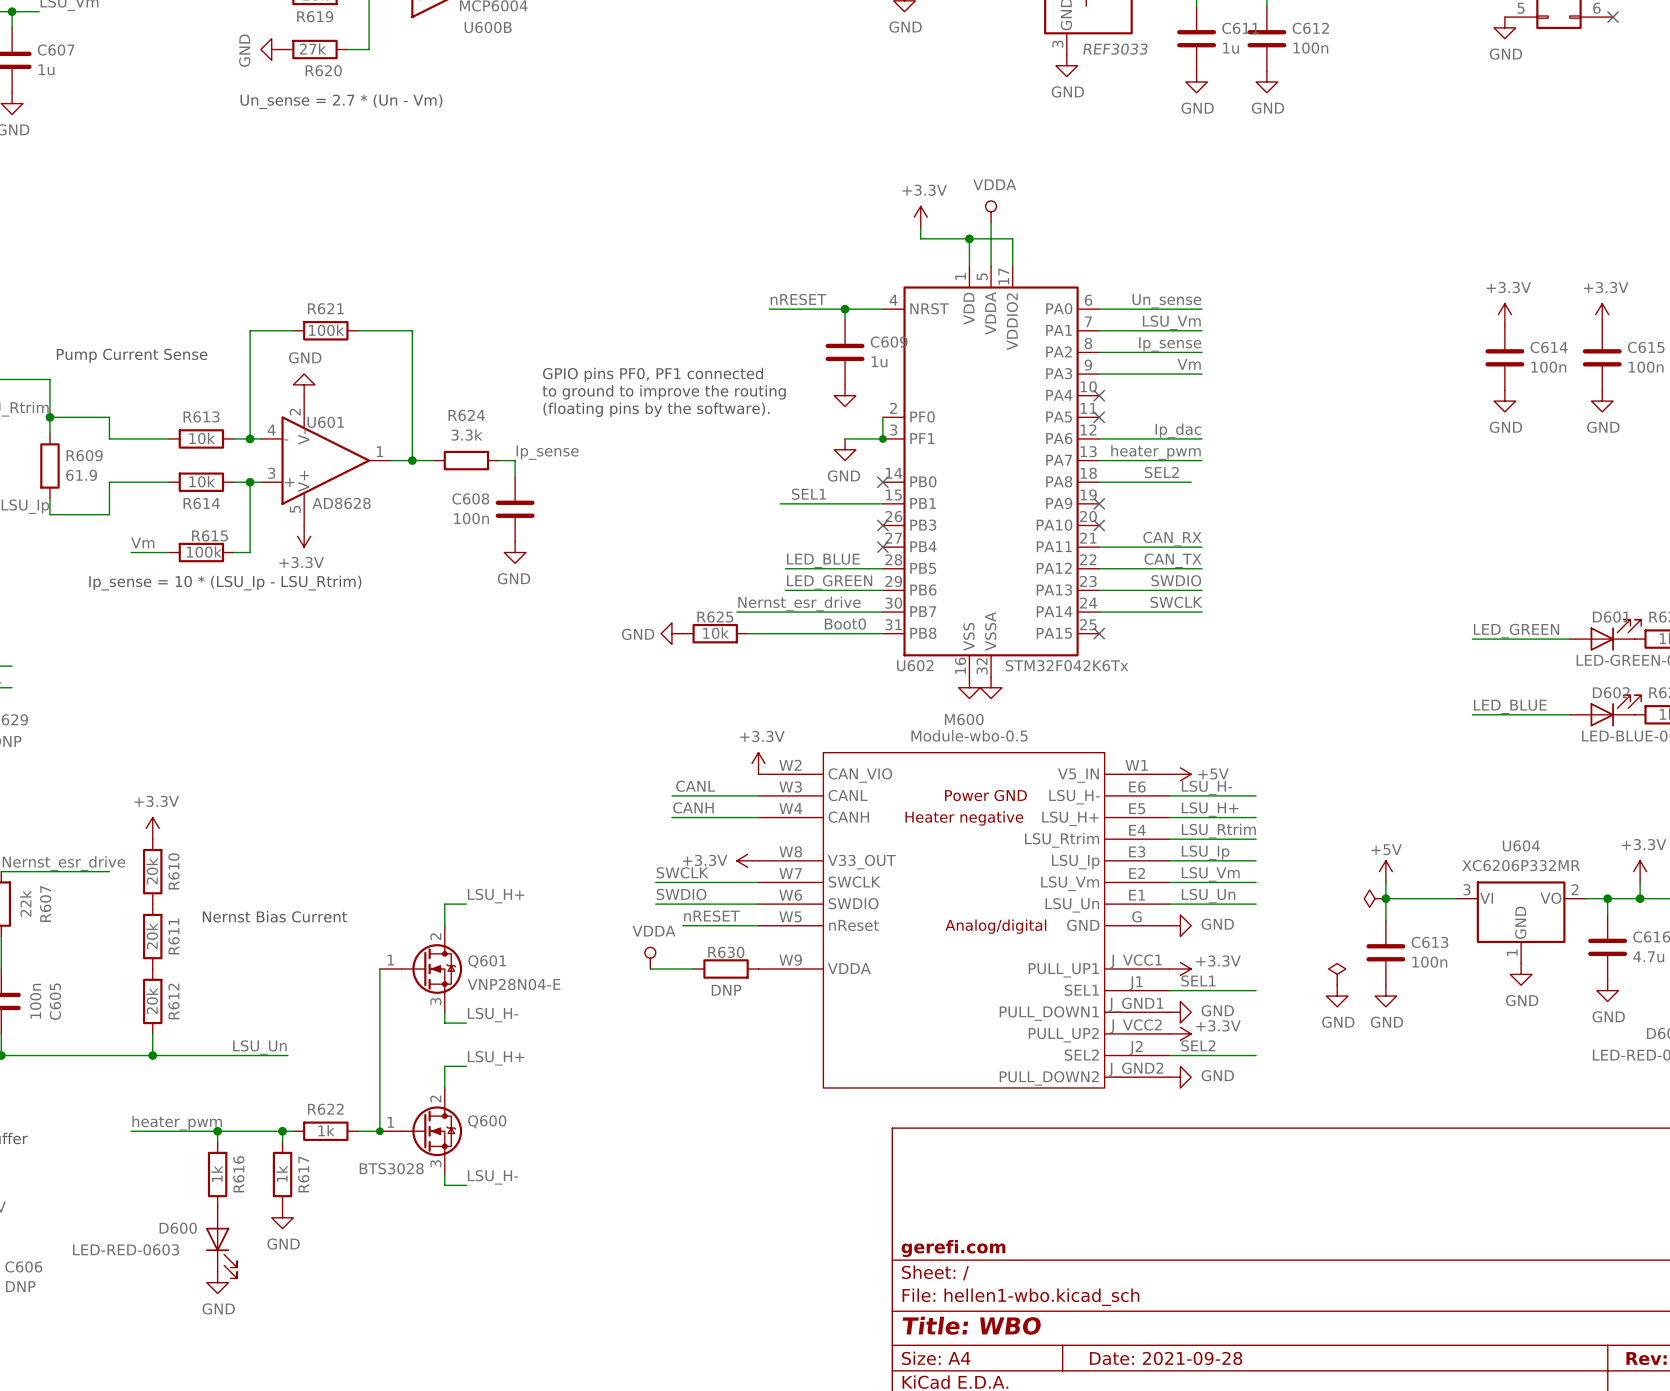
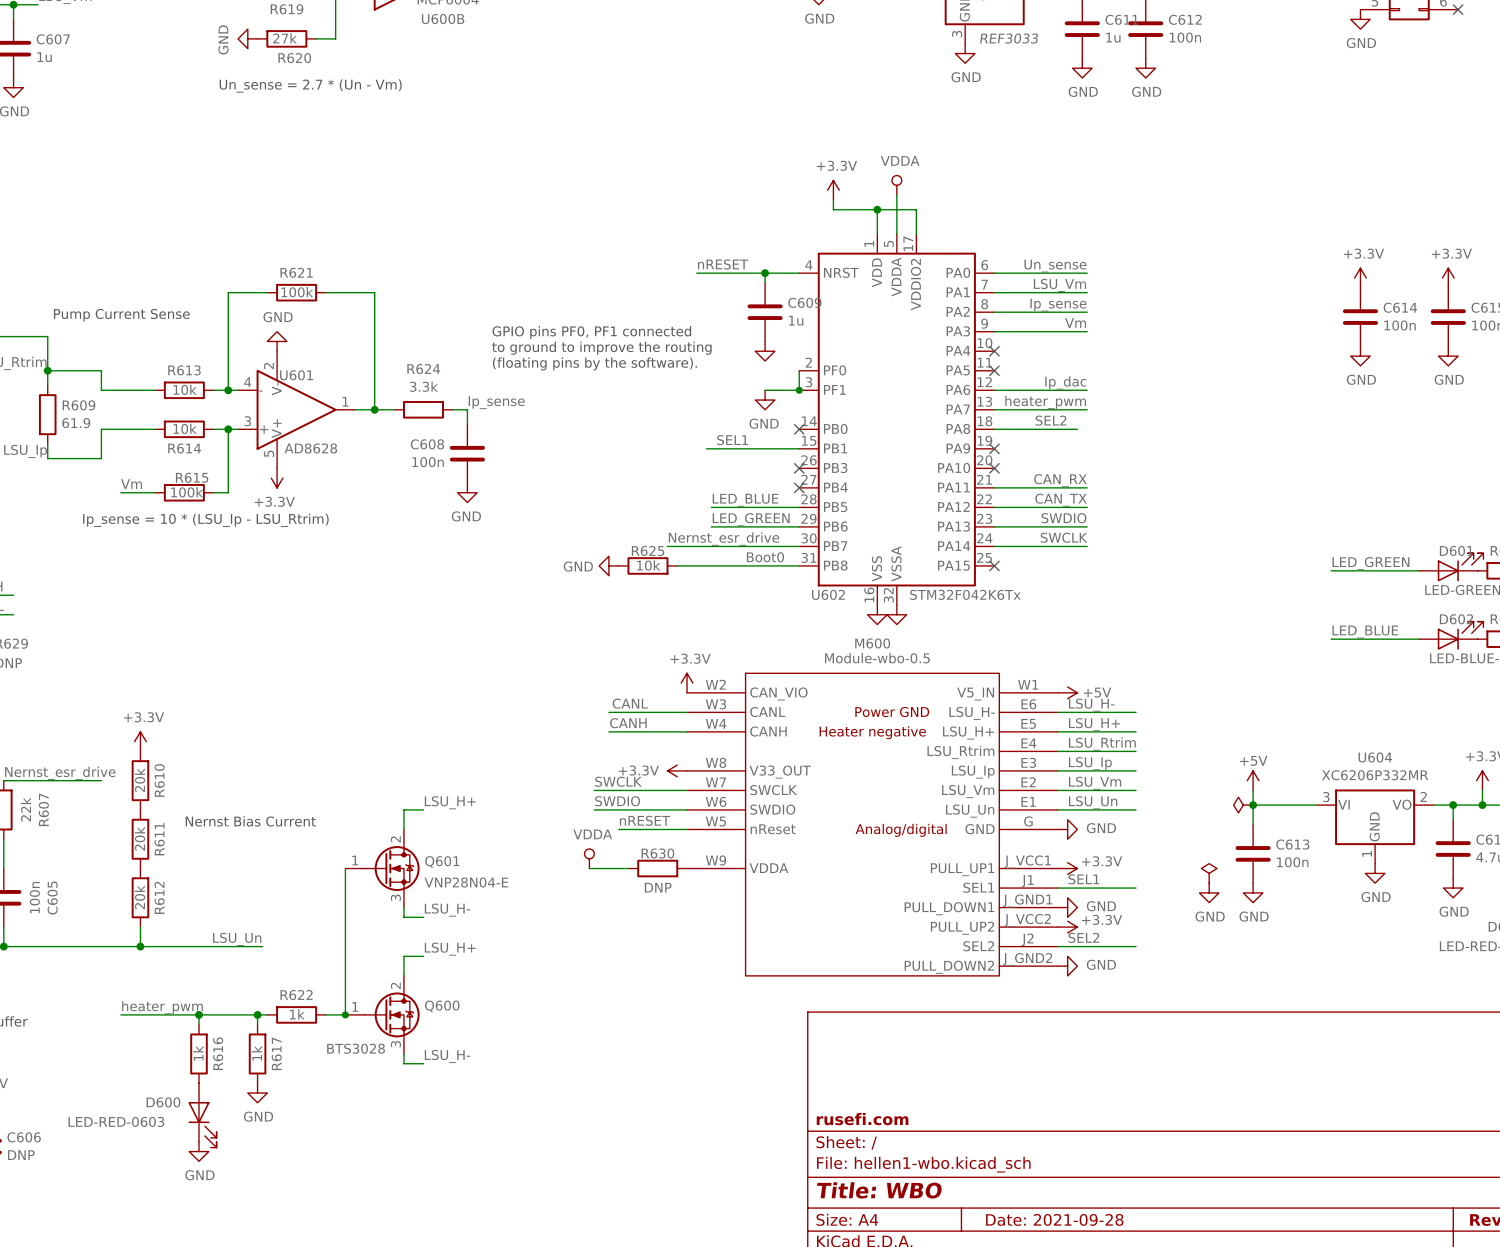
title block: gerefi.com (953, 1248) -> rusefi.com (862, 1119)

